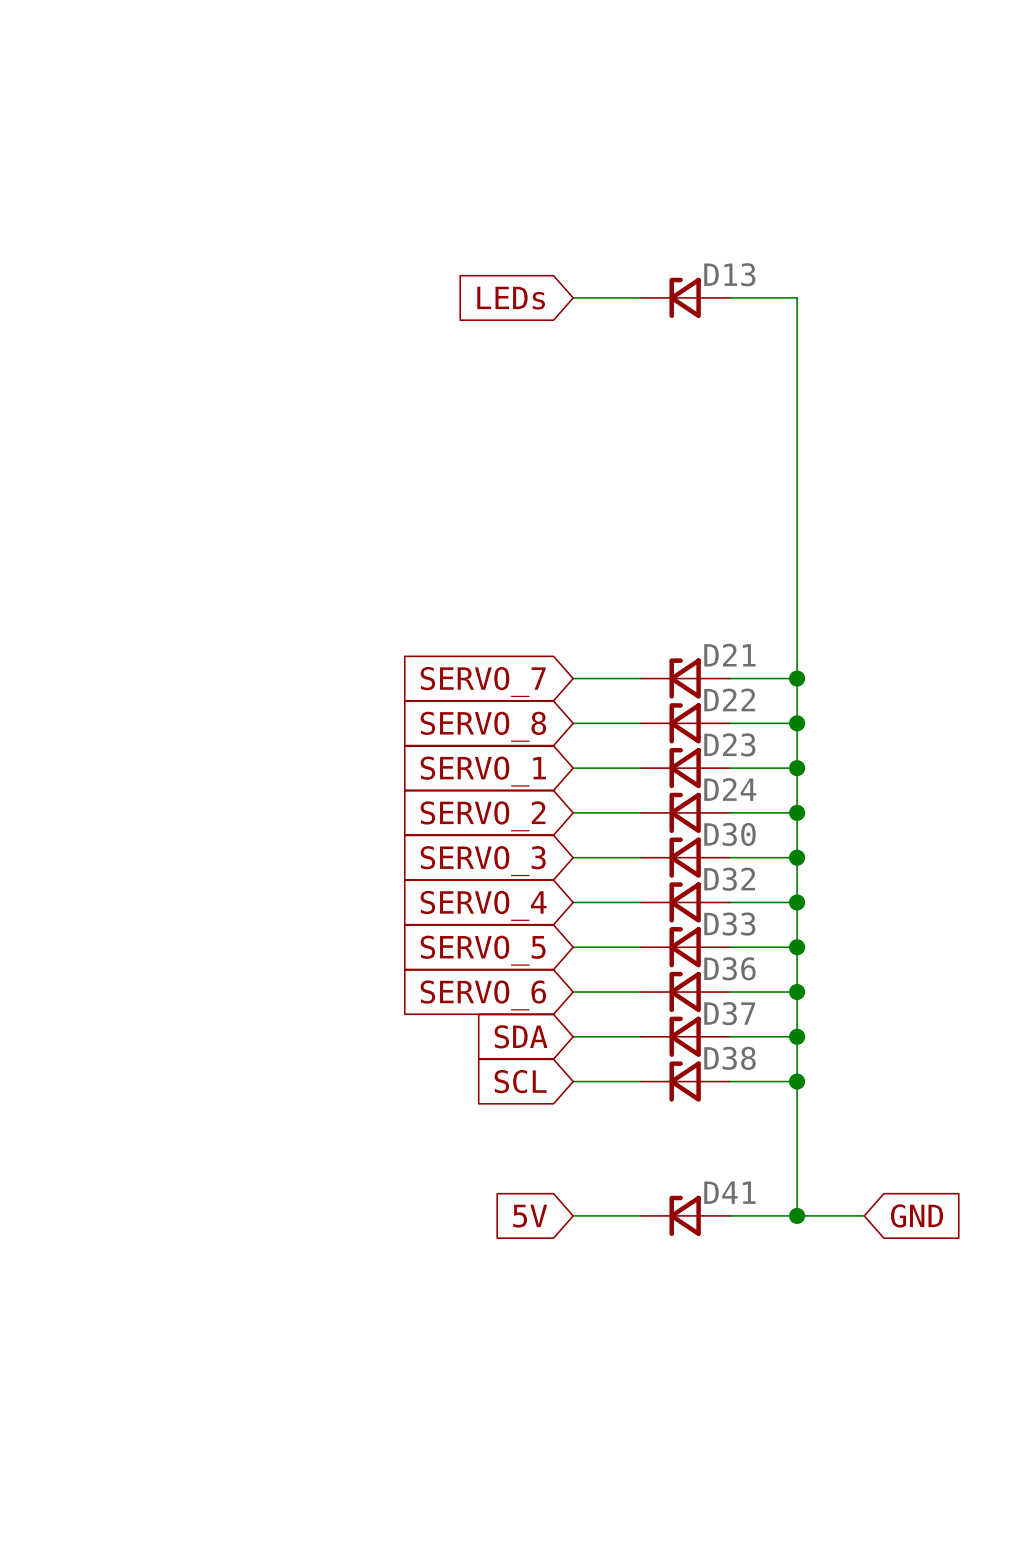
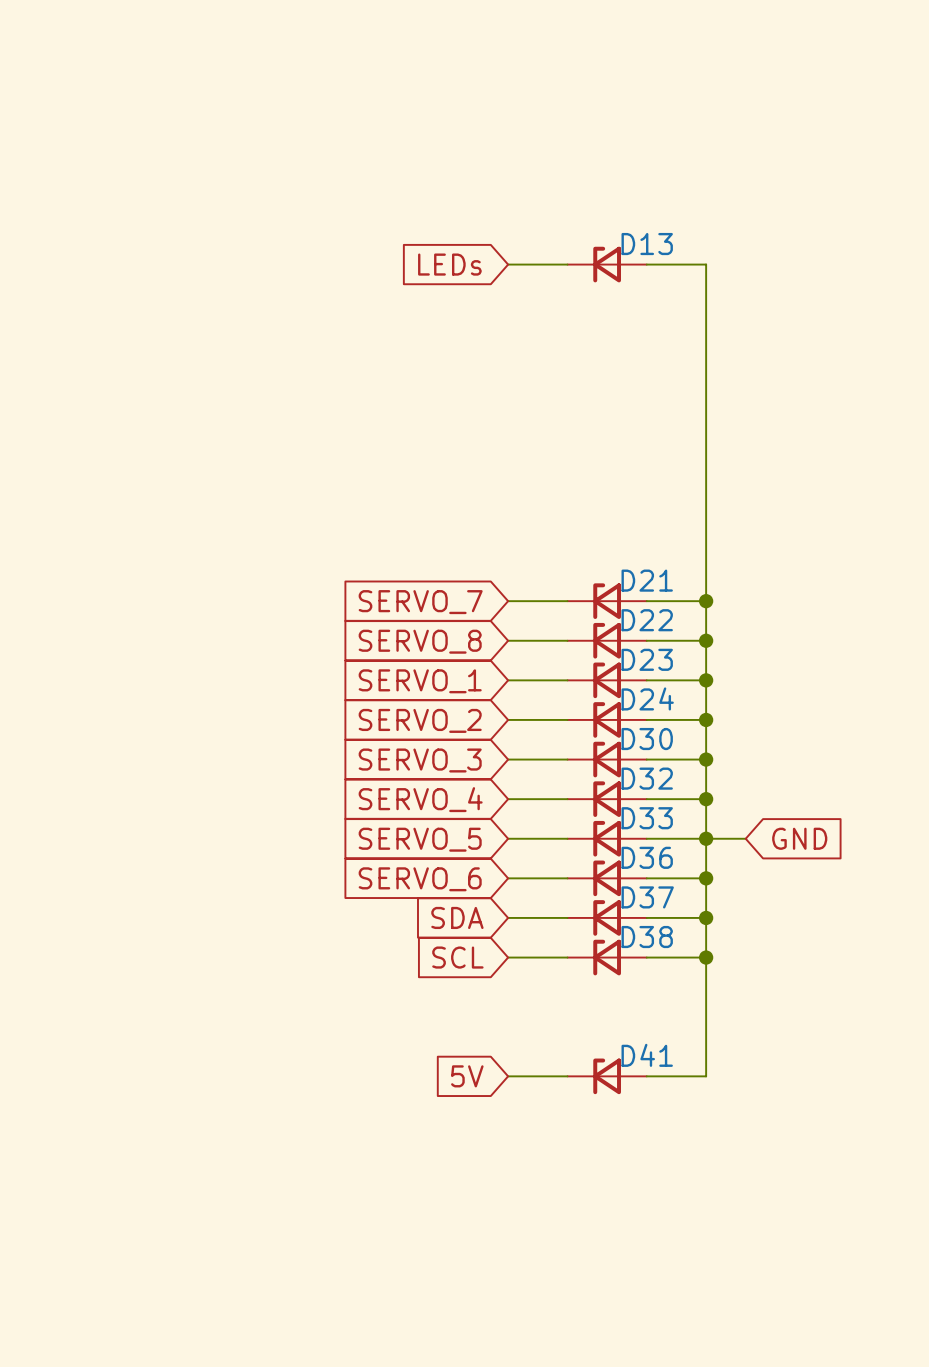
wire: none -> (706, 838) (745, 838)
wire: (797, 1215) (864, 1215) -> none
junction: (797, 1215) -> none
global label position: GND (917, 1215) -> GND (799, 838)

